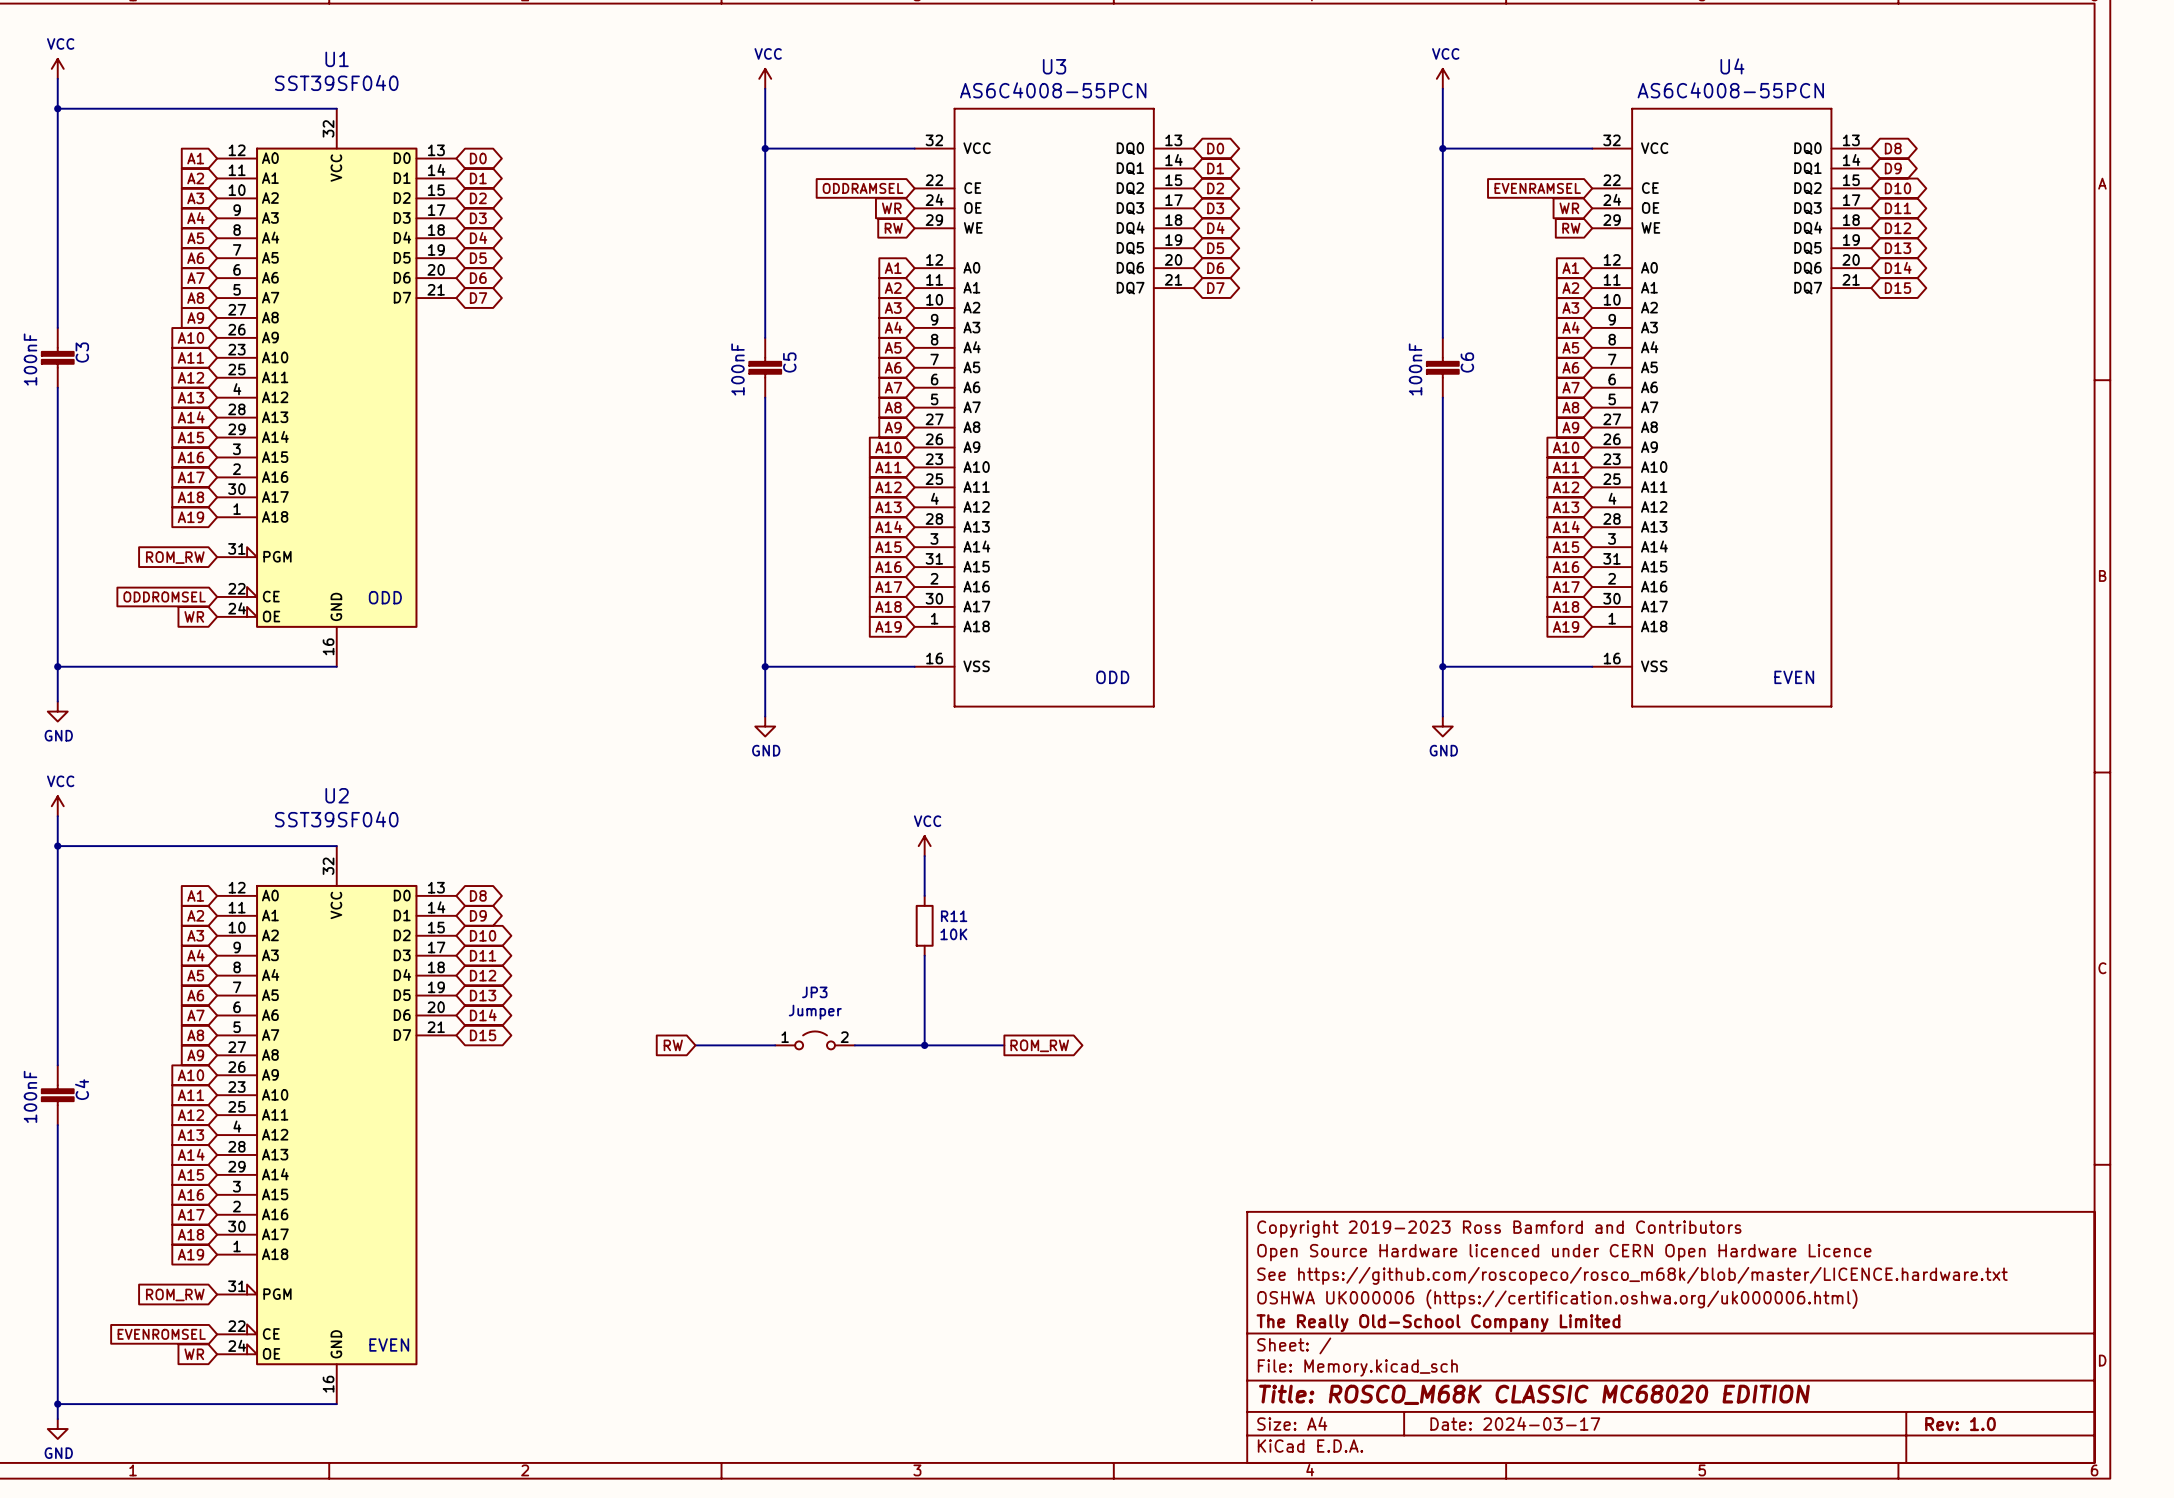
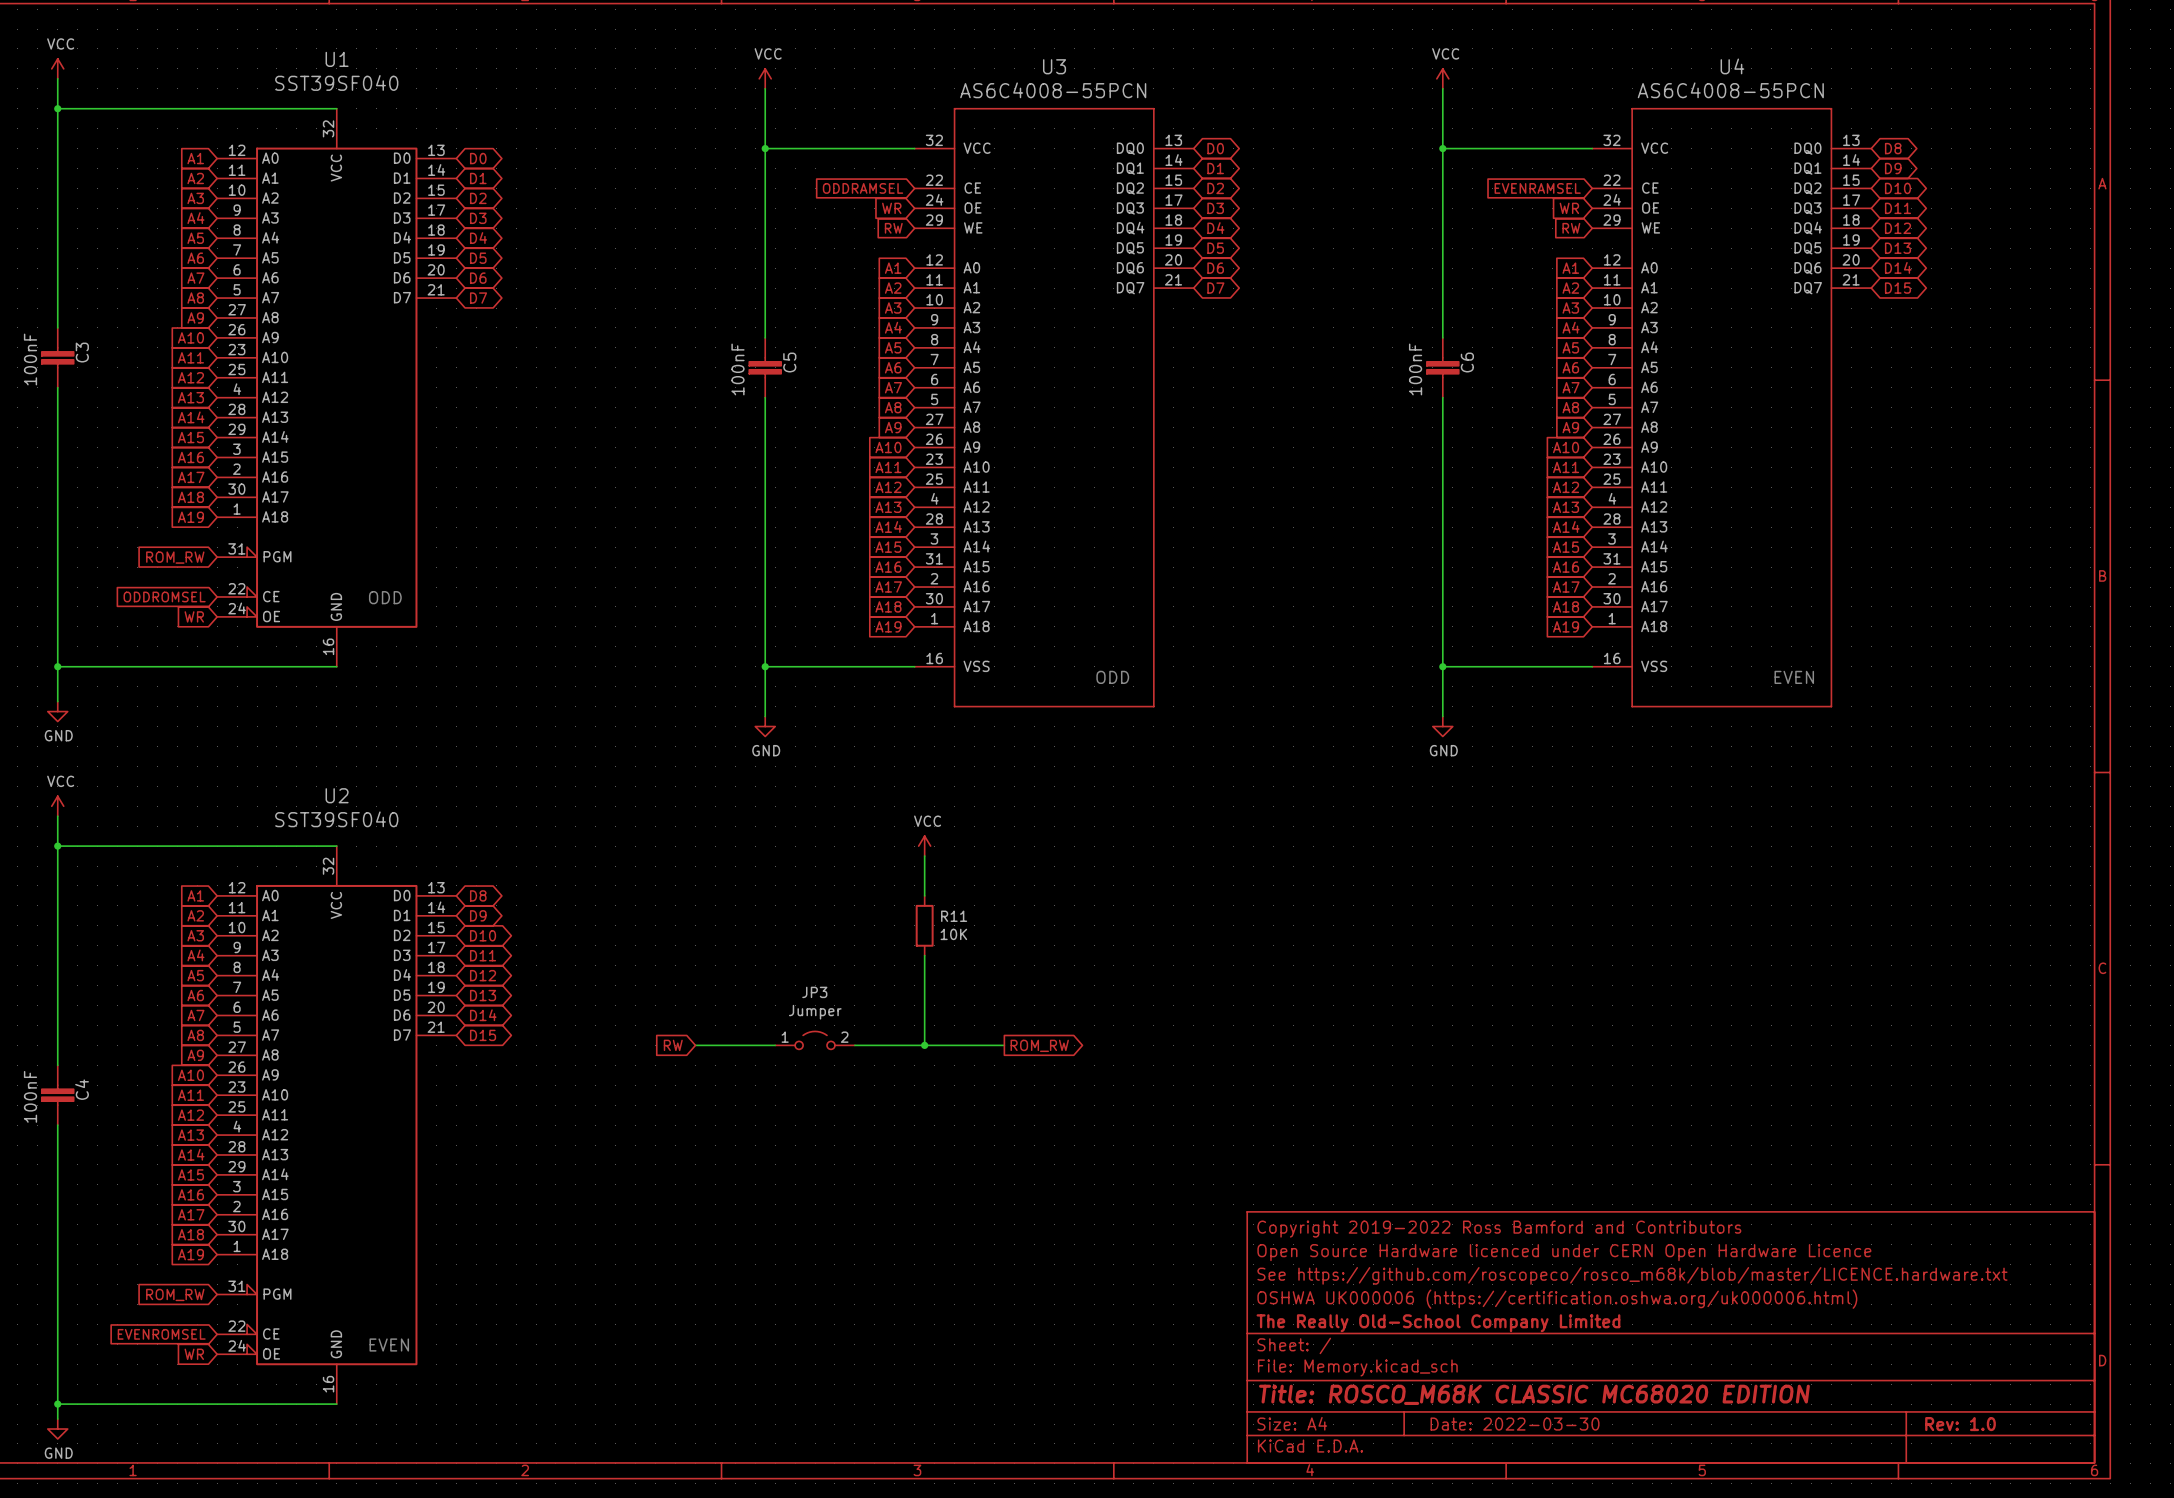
title block: Copyright 2019-2023 Ross Bamford and Contributors (1499, 1229) -> Copyright 2019-2022 Ross Bamford and Contributors (1499, 1229)
title block: Date: 2024-03-17 (1515, 1423) -> Date: 2022-03-30 (1515, 1424)

